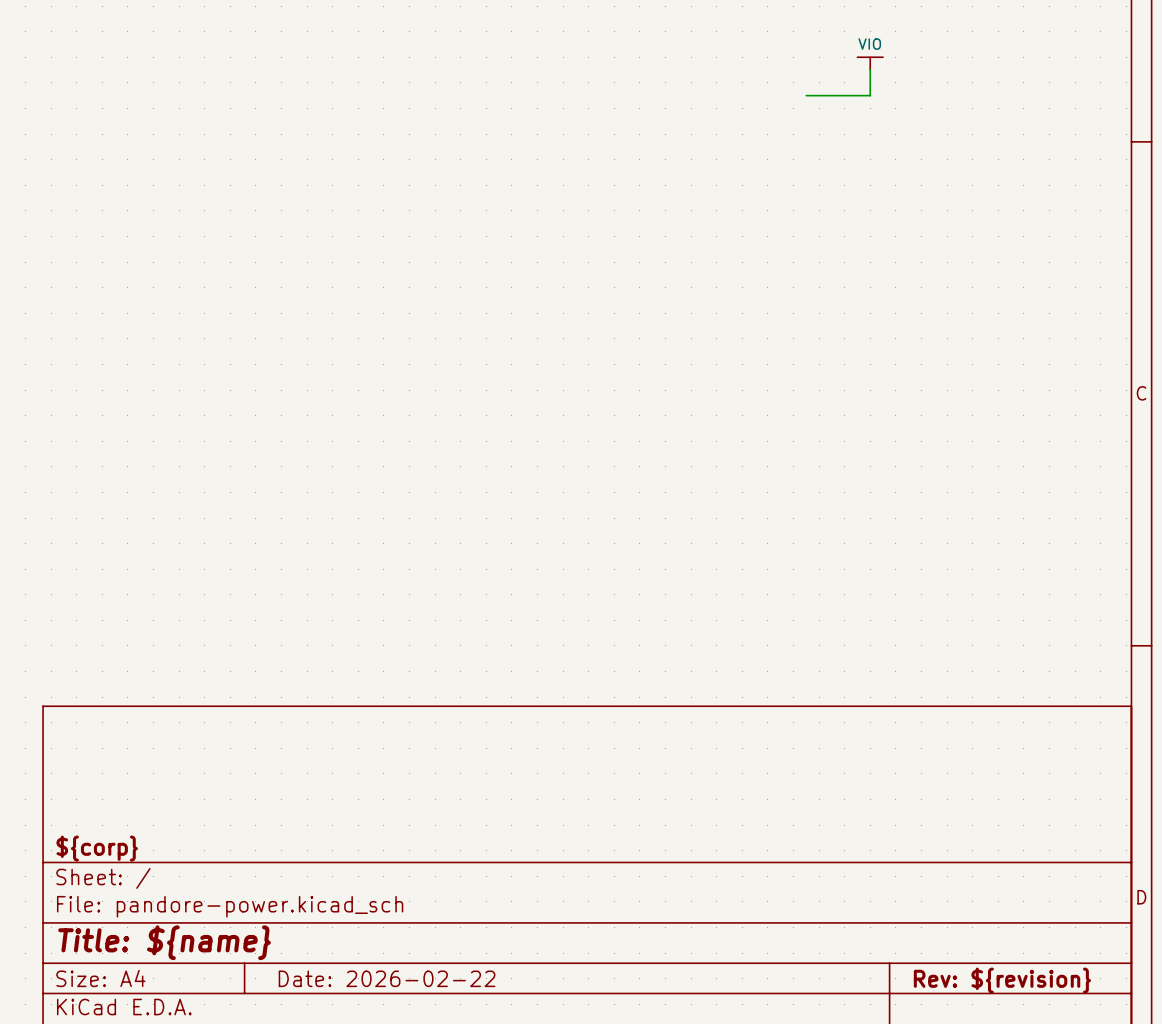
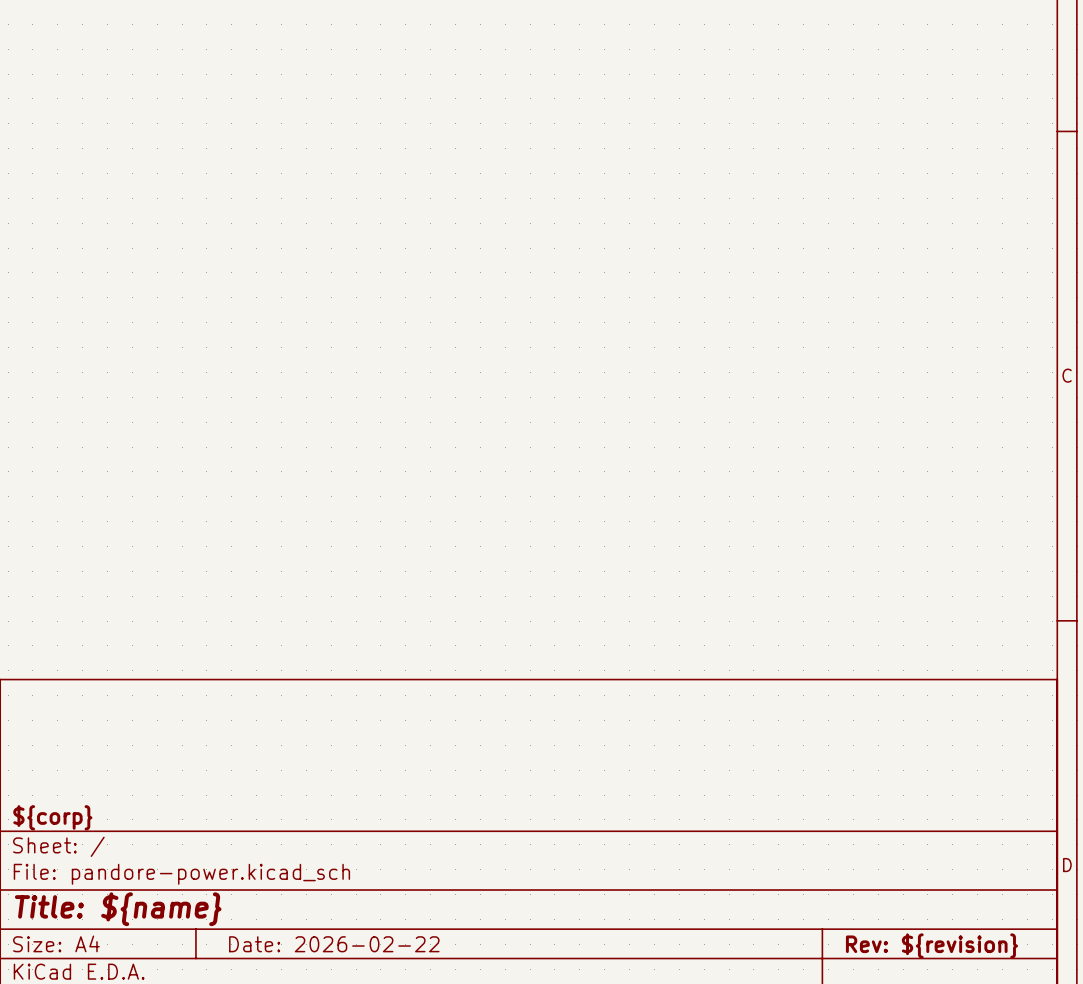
power symbol: VIO (870, 63) -> none
wire: (870, 70) (870, 95) (806, 95) -> none

